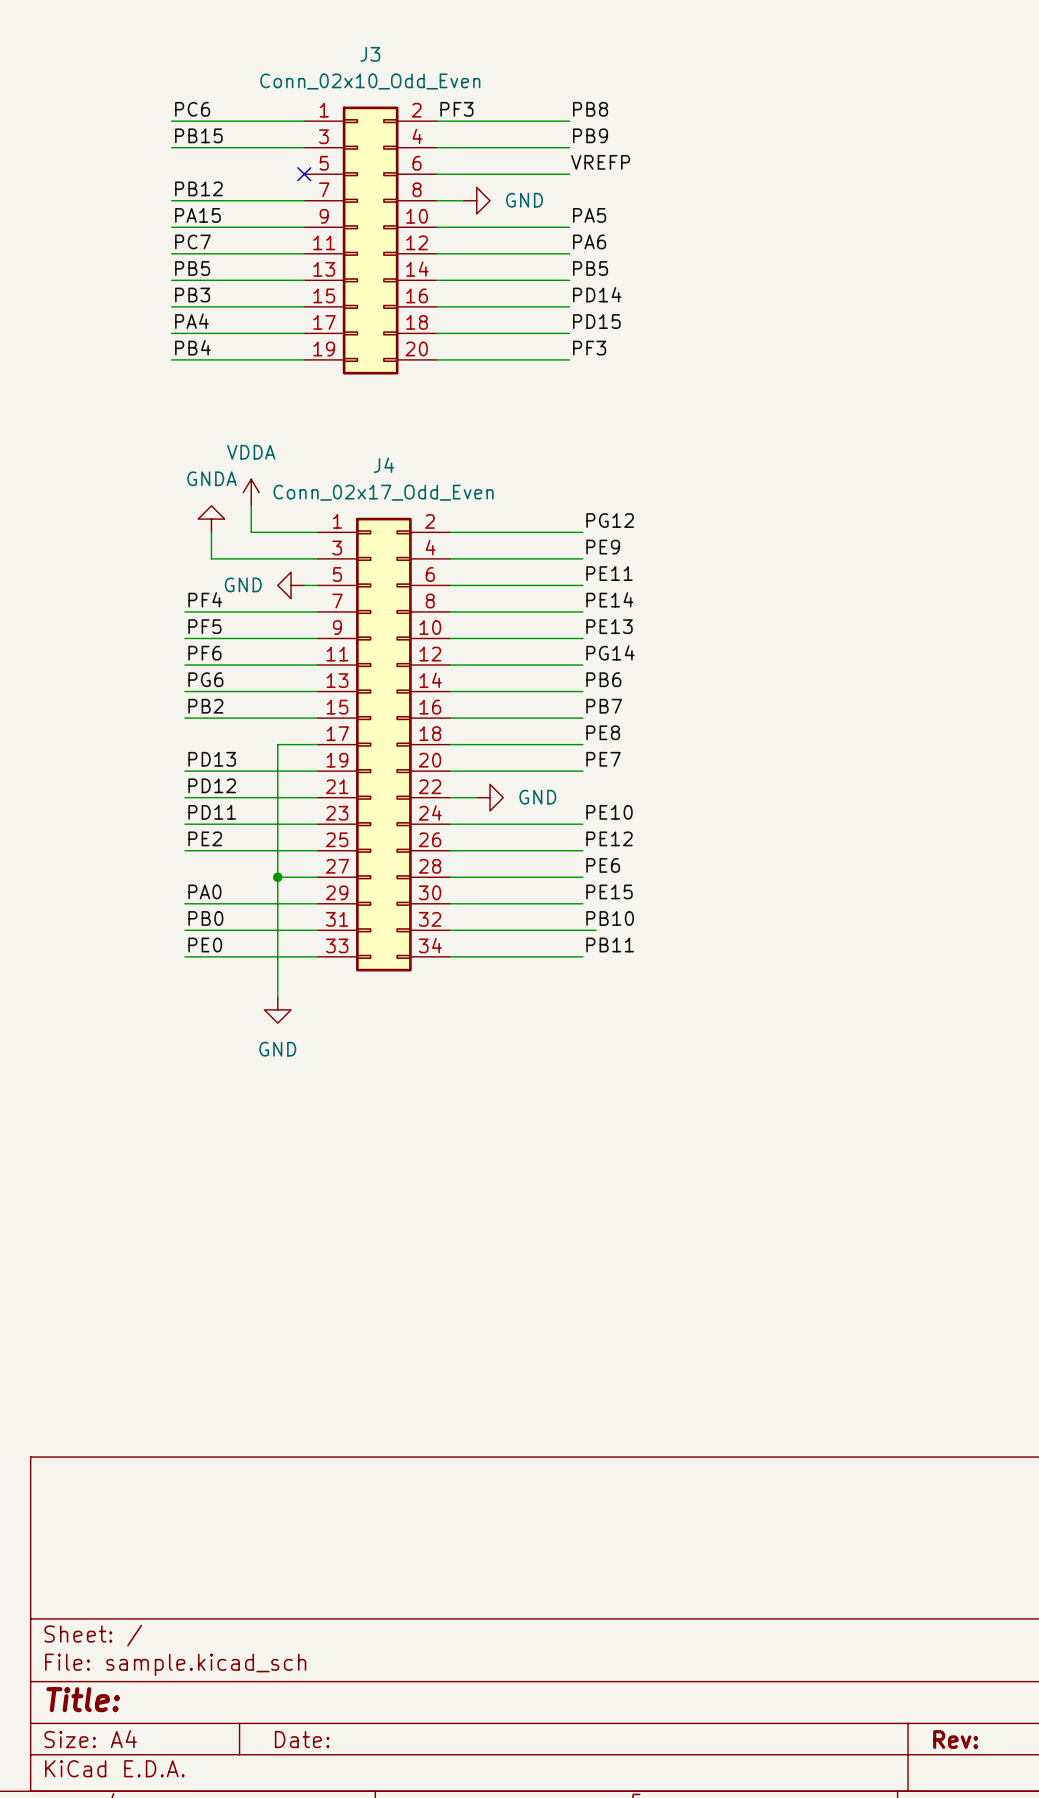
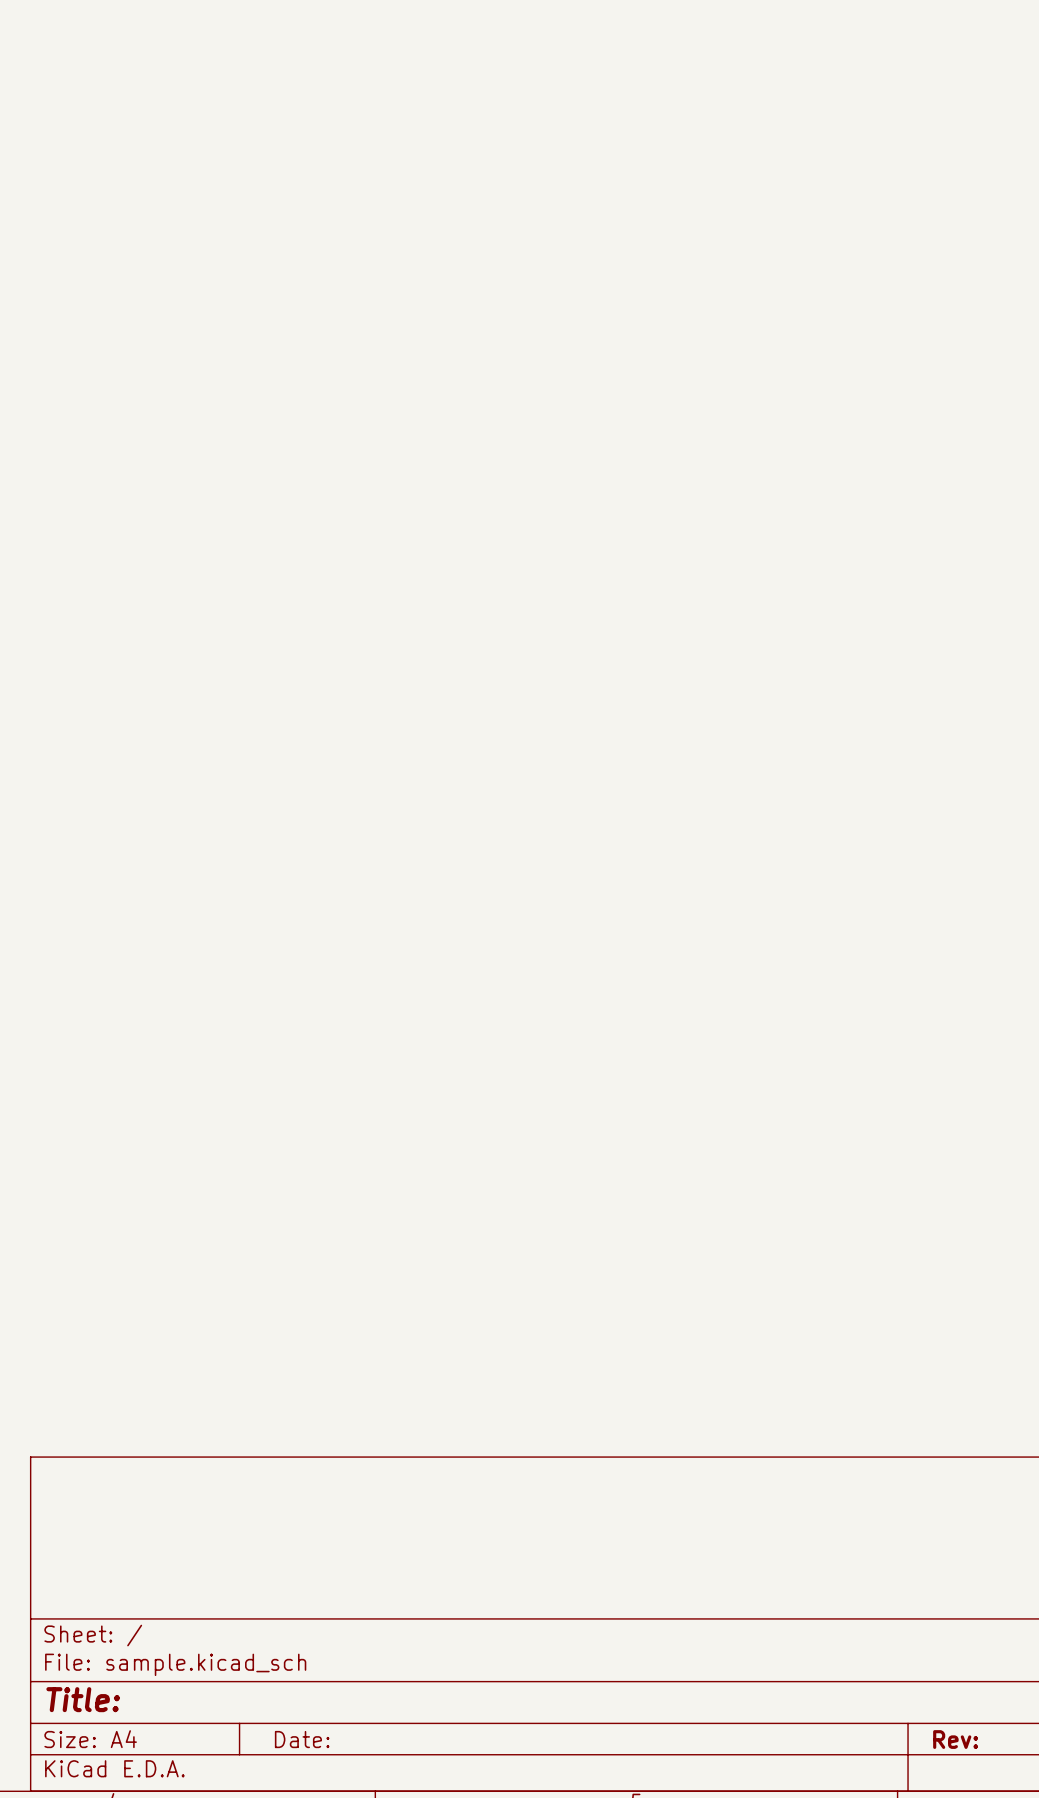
label: PC6 (192, 109) -> none
label: PF3 (456, 109) -> none
label: PB8 (590, 109) -> none
wire: (171, 121) (304, 121) -> none
wire: (436, 121) (569, 121) -> none
label: PB15 (198, 135) -> none
label: PB9 (590, 135) -> none
wire: (171, 147) (304, 147) -> none
wire: (436, 147) (569, 147) -> none
label: VREFP (600, 162) -> none
no-connect mark: (304, 174) -> none
wire: (436, 174) (569, 174) -> none
label: PB12 (198, 188) -> none
wire: (171, 200) (304, 200) -> none
wire: (436, 200) (463, 200) -> none
power symbol: GND (476, 200) -> none
label: PA15 (197, 215) -> none
label: PA5 (589, 215) -> none
wire: (171, 227) (304, 227) -> none
wire: (436, 227) (569, 227) -> none
J3: Conn_02x10_Odd_Even (370, 240) -> none
label: PC7 (192, 241) -> none
label: PA6 (589, 241) -> none
wire: (171, 253) (304, 253) -> none
wire: (436, 253) (569, 253) -> none
label: PB5 (192, 268) -> none
label: PB5 (590, 268) -> none
wire: (171, 280) (304, 280) -> none
wire: (436, 280) (569, 280) -> none
label: PD14 (597, 294) -> none
label: PB3 (192, 295) -> none
wire: (171, 306) (304, 306) -> none
wire: (436, 306) (569, 306) -> none
label: PA4 (191, 321) -> none
label: PD15 (596, 321) -> none
wire: (171, 333) (304, 333) -> none
wire: (436, 333) (569, 333) -> none
label: PB4 (192, 347) -> none
label: PF3 (589, 348) -> none
wire: (171, 359) (304, 359) -> none
wire: (436, 359) (569, 359) -> none
power symbol: VDDA (251, 492) -> none
wire: (251, 505) (251, 532) (317, 532) -> none
power symbol: GNDA (211, 519) -> none
label: PG12 (610, 520) -> none
wire: (211, 532) (211, 558) (317, 558) -> none
wire: (450, 532) (582, 532) -> none
label: PE9 (603, 547) -> none
wire: (450, 558) (582, 558) -> none
label: PE11 (609, 573) -> none
power symbol: GND (291, 585) -> none
wire: (304, 585) (317, 585) -> none
wire: (450, 585) (582, 585) -> none
label: PF4 (205, 599) -> none
label: PE14 (609, 599) -> none
wire: (184, 611) (317, 611) -> none
wire: (450, 611) (582, 611) -> none
label: PF5 (204, 626) -> none
label: PE13 (609, 626) -> none
wire: (184, 638) (317, 638) -> none
wire: (450, 638) (582, 638) -> none
label: PG14 (610, 652) -> none
label: PF6 (204, 653) -> none
wire: (184, 665) (317, 665) -> none
wire: (450, 665) (582, 665) -> none
label: PG6 (205, 679) -> none
label: PB6 (603, 679) -> none
wire: (184, 691) (317, 691) -> none
wire: (450, 691) (582, 691) -> none
label: PB2 (205, 706) -> none
label: PB7 (604, 706) -> none
wire: (184, 718) (317, 718) -> none
wire: (450, 718) (582, 718) -> none
label: PE8 (603, 732) -> none
wire: (317, 744) (277, 744) (277, 996) -> none
J4: Conn_02x17_Odd_Even (383, 744) -> none
wire: (450, 744) (582, 744) -> none
label: PD13 (212, 759) -> none
label: PE7 (603, 759) -> none
wire: (184, 771) (317, 771) -> none
wire: (450, 771) (582, 771) -> none
label: PD12 (212, 785) -> none
wire: (184, 797) (317, 797) -> none
wire: (450, 797) (476, 797) -> none
power symbol: GND (490, 797) -> none
label: PD11 (212, 812) -> none
label: PE10 (609, 812) -> none
wire: (184, 824) (317, 824) -> none
wire: (450, 824) (582, 824) -> none
label: PE2 (205, 838) -> none
label: PE12 (609, 838) -> none
wire: (184, 850) (317, 850) -> none
wire: (450, 850) (582, 850) -> none
label: PE6 (603, 865) -> none
wire: (277, 877) (317, 877) -> none
junction: (277, 877) -> none
wire: (450, 877) (582, 877) -> none
label: PA0 (204, 891) -> none
label: PE15 (609, 891) -> none
wire: (184, 903) (317, 903) -> none
wire: (450, 903) (582, 903) -> none
label: PB0 (205, 918) -> none
label: PB10 (610, 918) -> none
wire: (184, 930) (317, 930) -> none
wire: (450, 930) (596, 930) -> none
label: PE0 (205, 945) -> none
label: PB11 (610, 945) -> none
wire: (184, 956) (317, 956) -> none
wire: (450, 956) (582, 956) -> none
power symbol: GND (277, 1009) -> none

